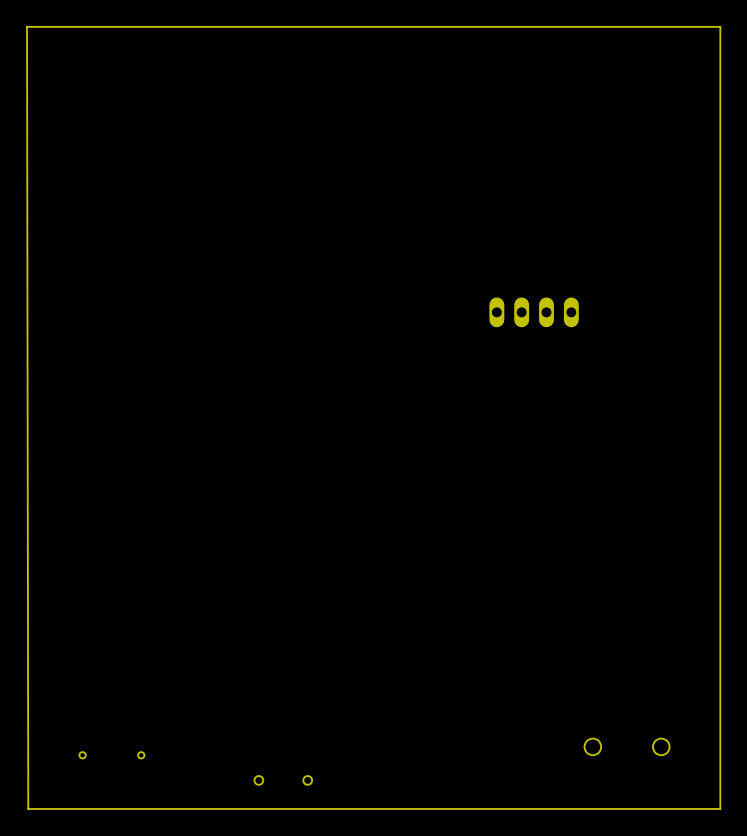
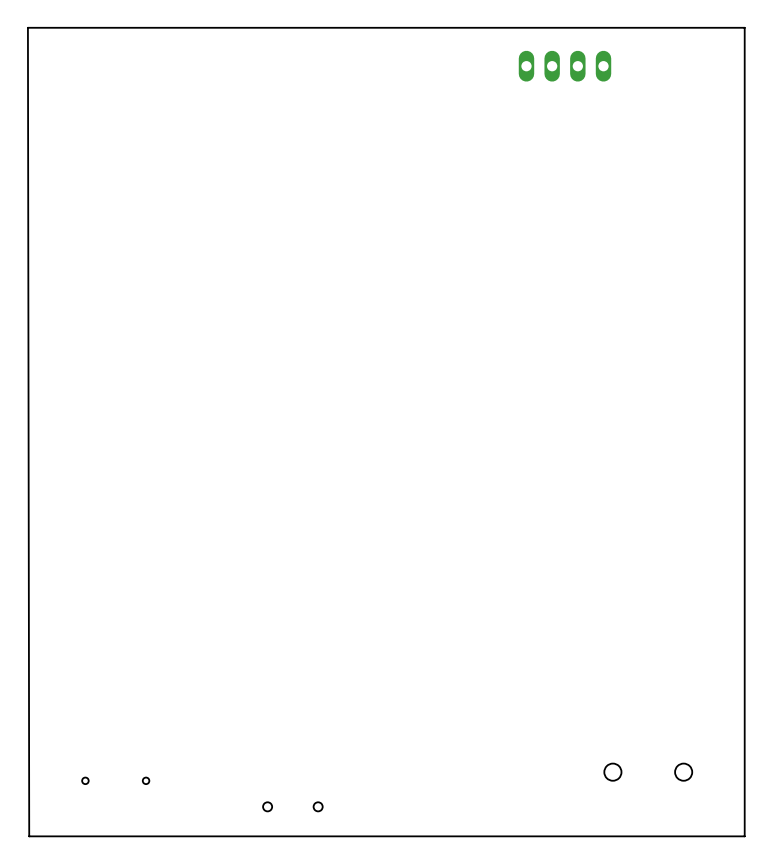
part: none -> (565, 66)
part: (534, 312) -> none

